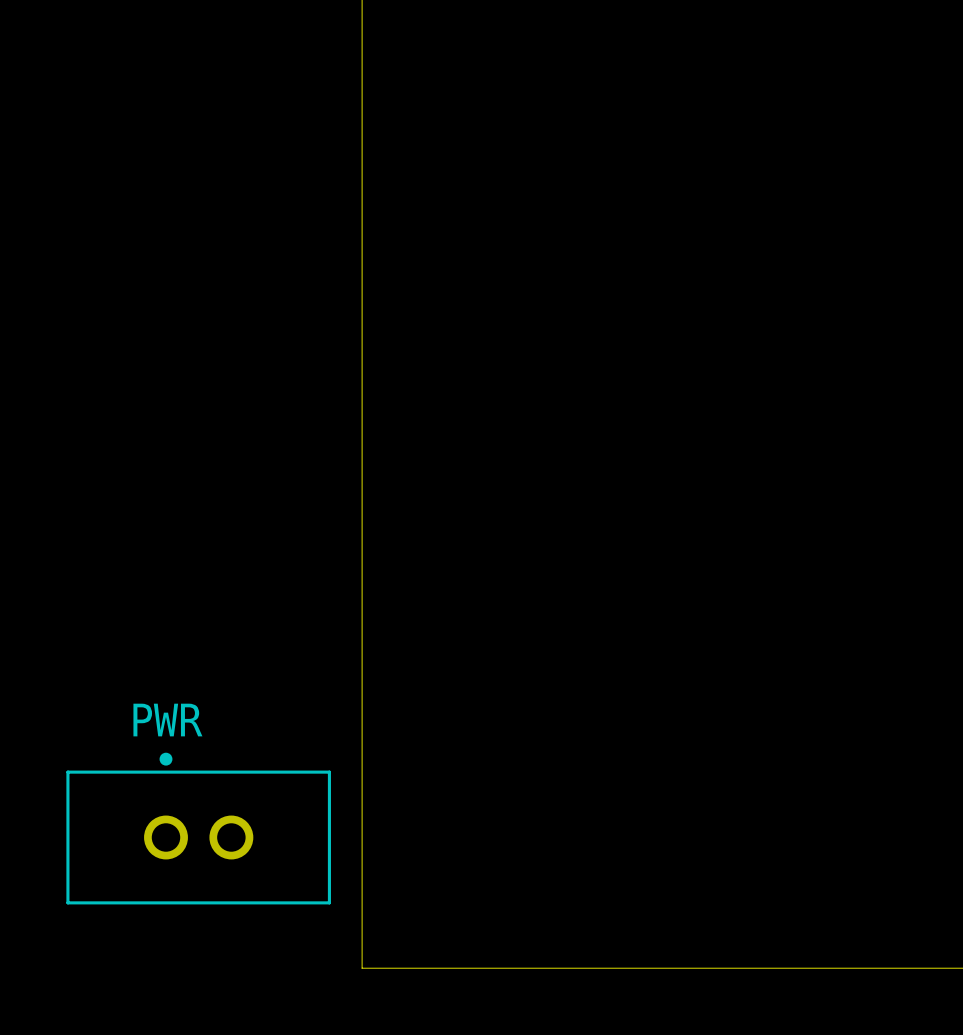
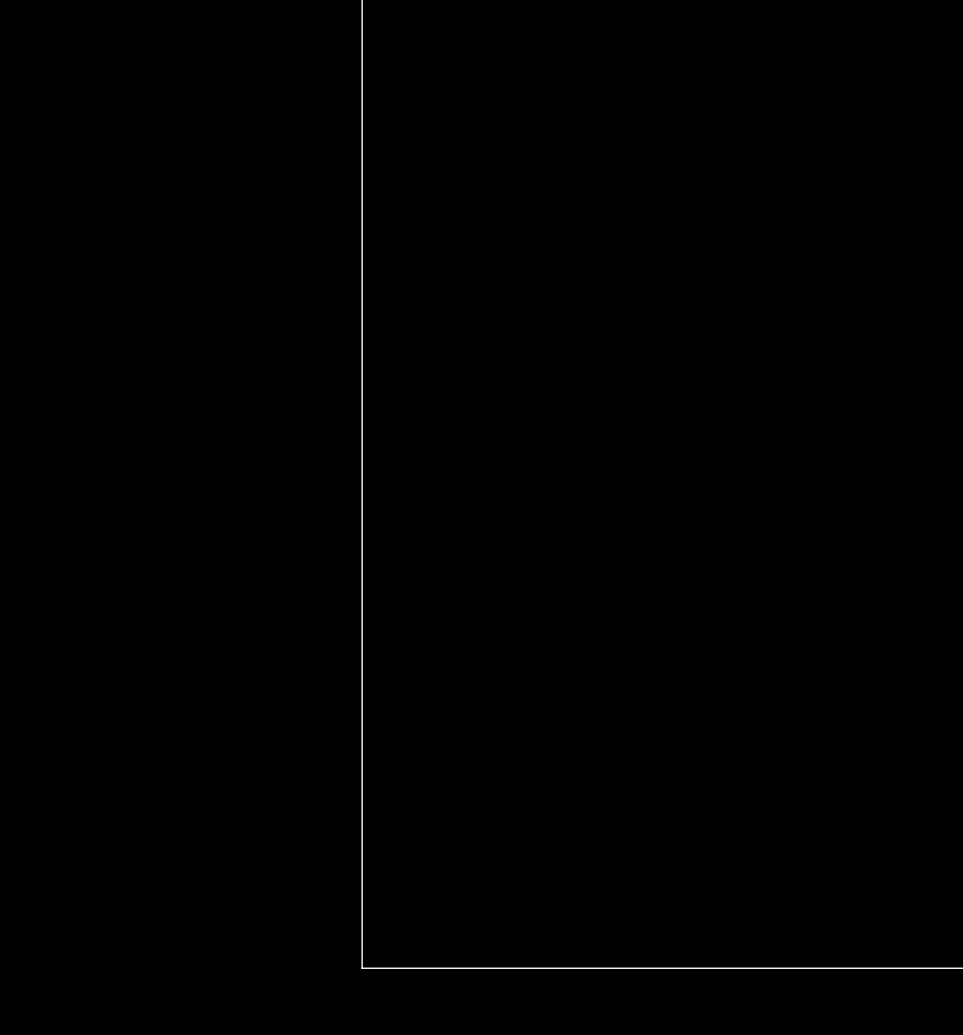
PWR: (198, 828) -> none

